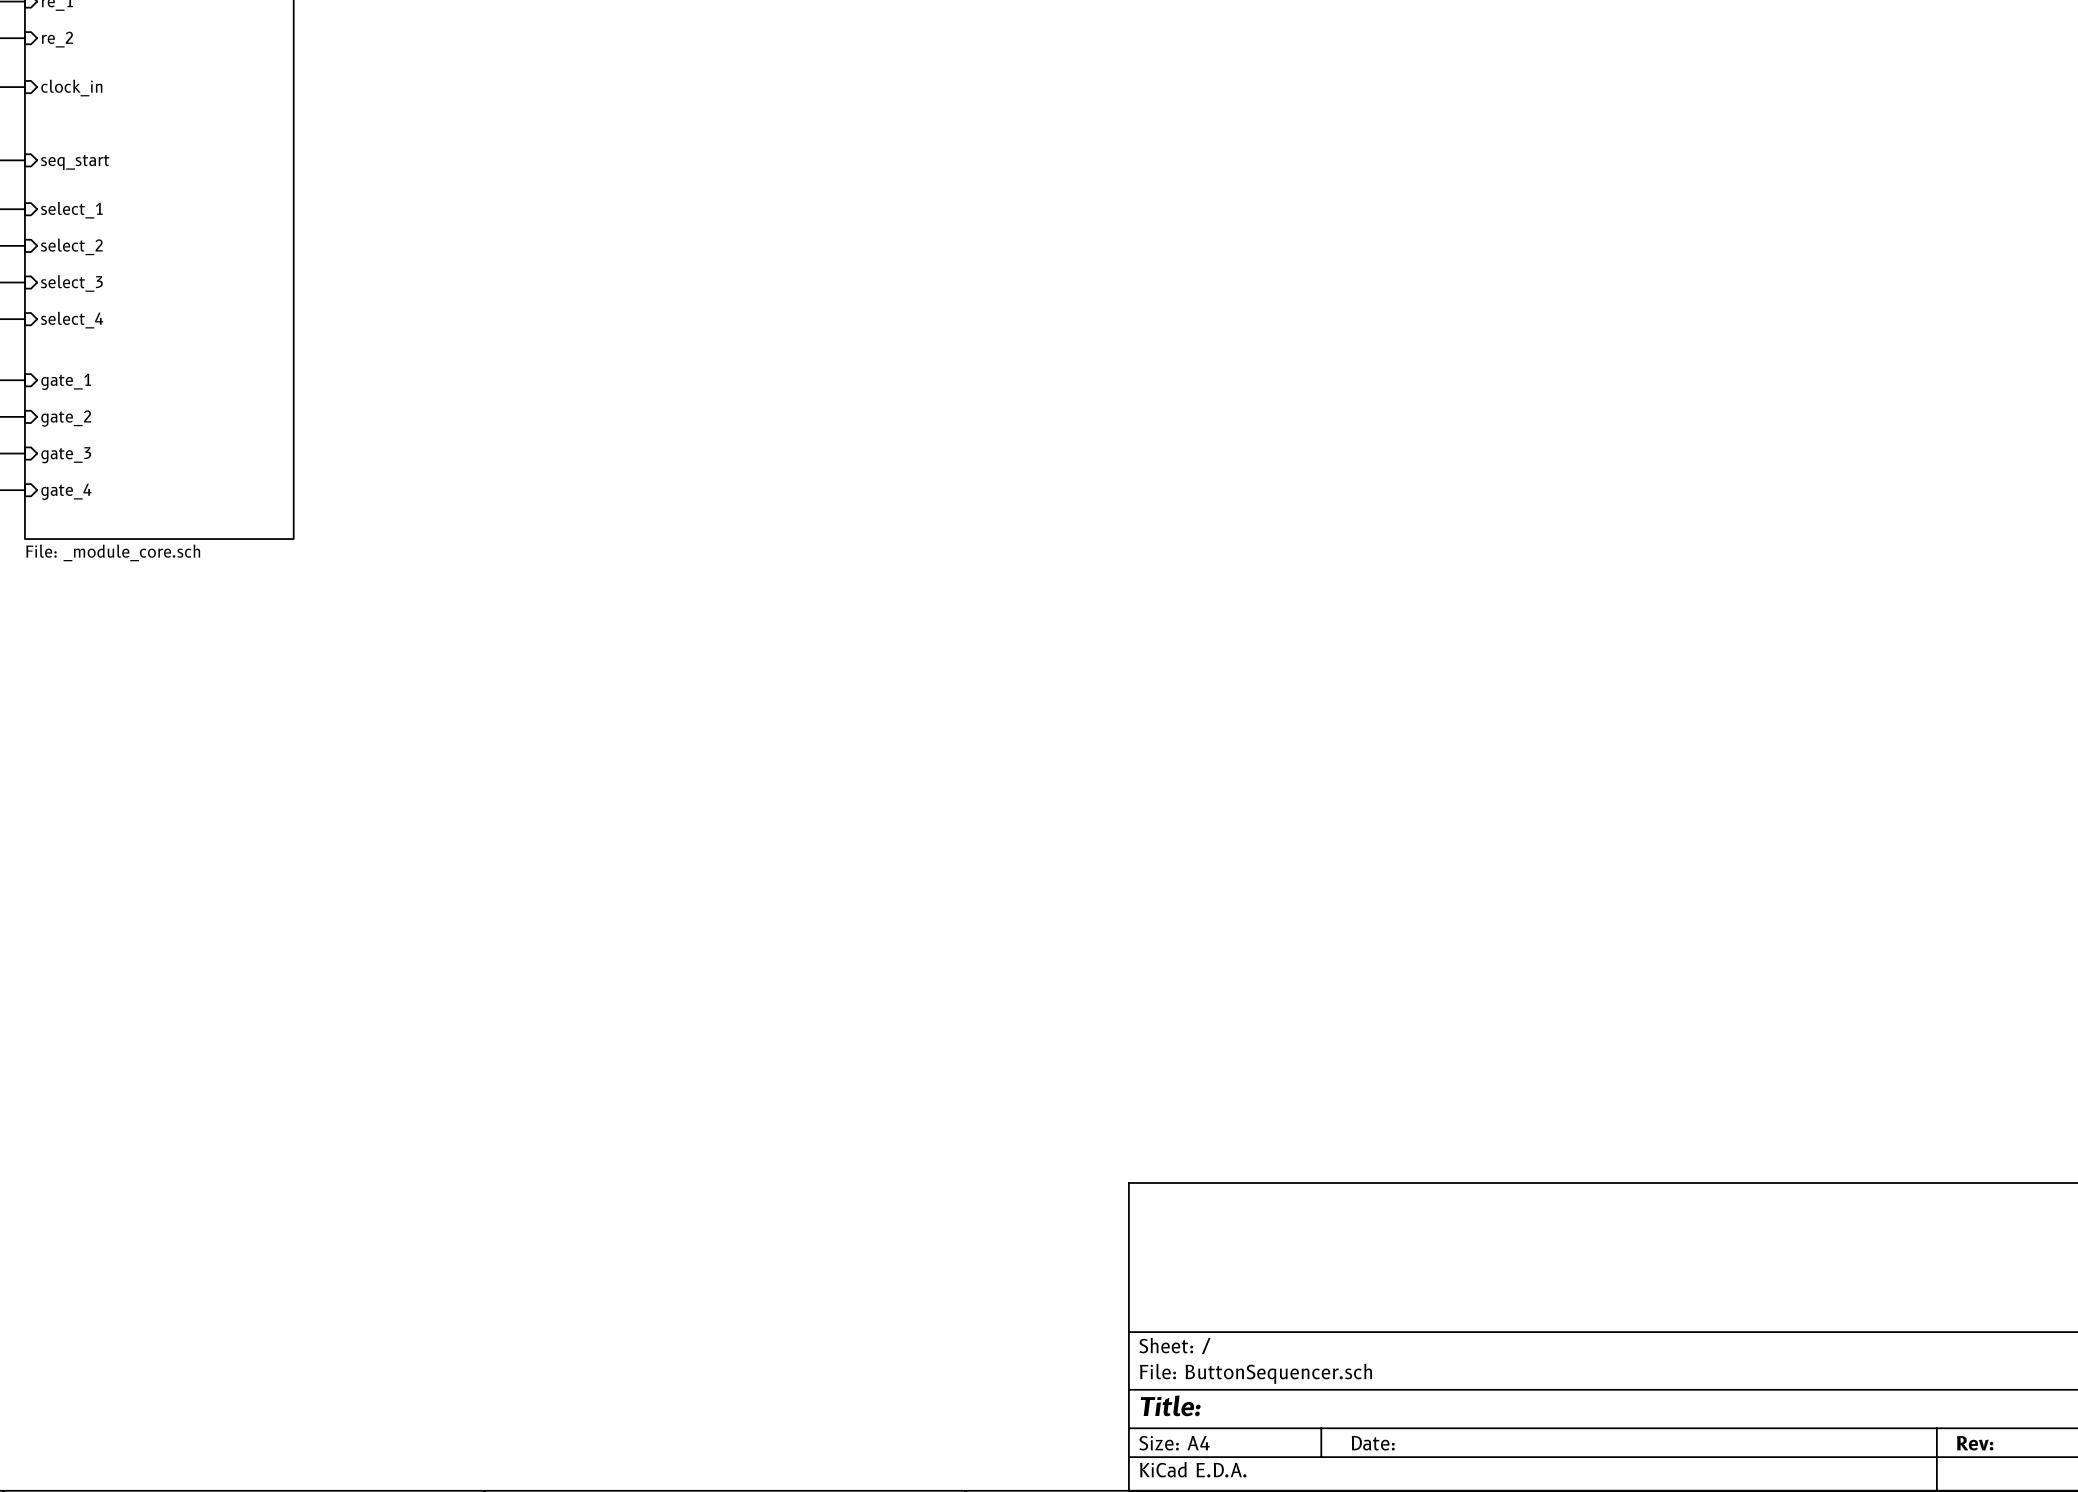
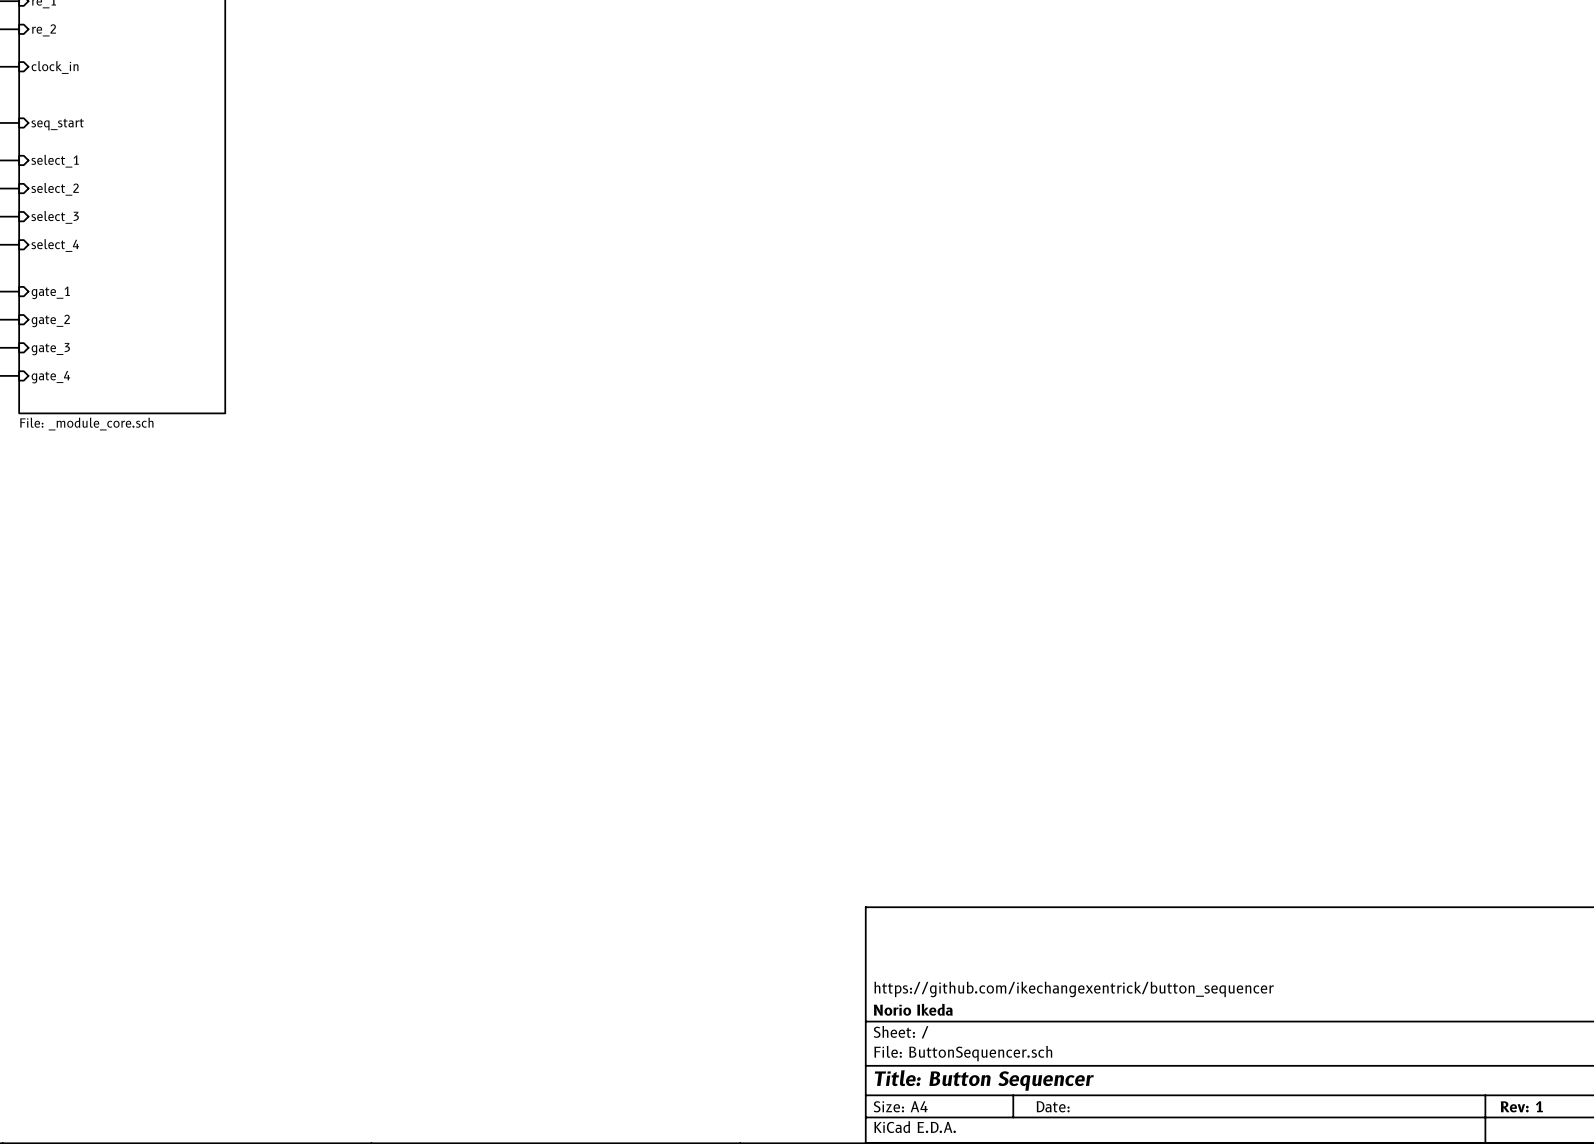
title block: none -> https://github.com/ikechangexentrick/button_sequencer (1074, 989)
title block: none -> Norio Ikeda (913, 1009)
title block: Title: (1170, 1405) -> Title: Button Sequencer (984, 1080)
title block: Rev: (1975, 1443) -> Rev: 1 (1521, 1106)

